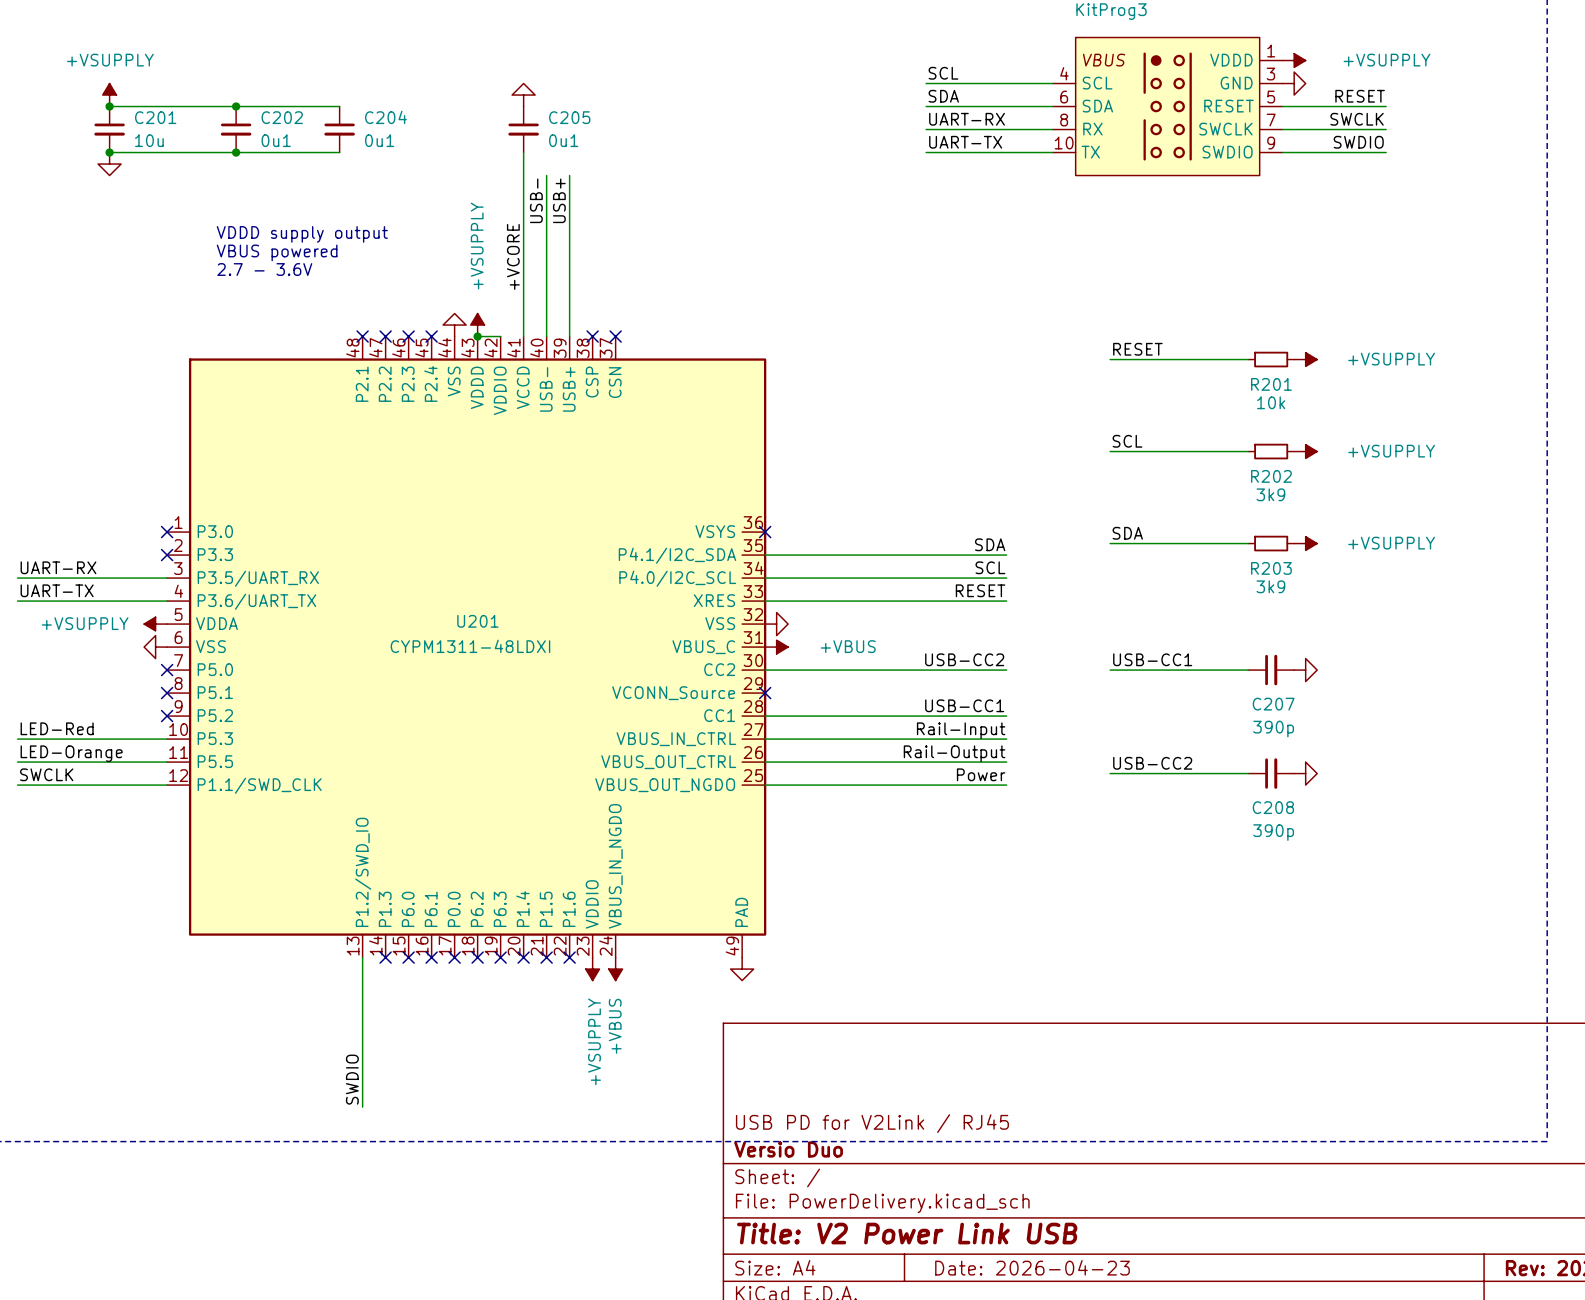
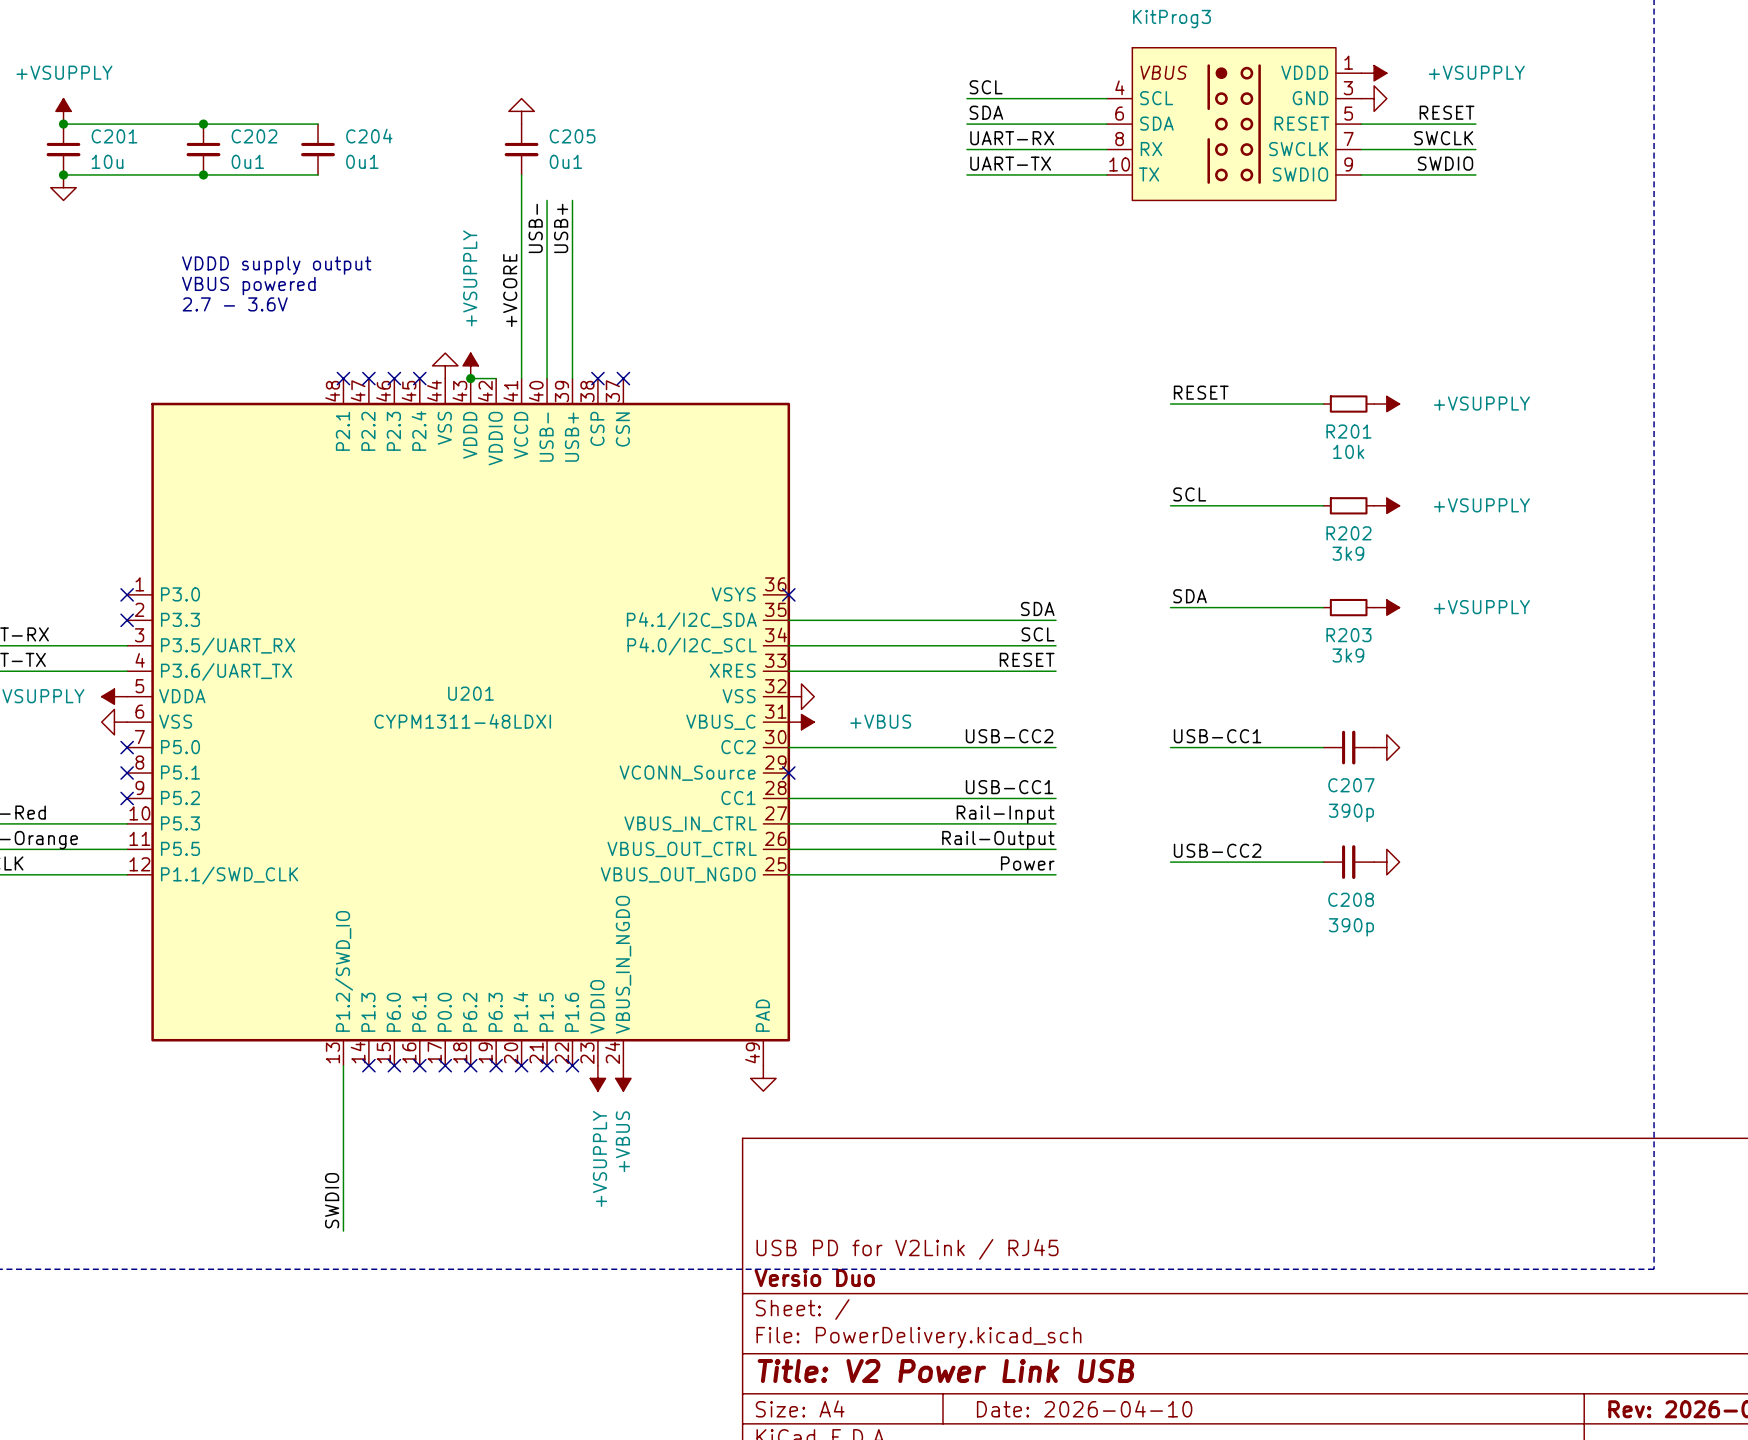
title block: Date: 2026-04-23 (1032, 1267) -> Date: 2026-04-10 (1084, 1408)

